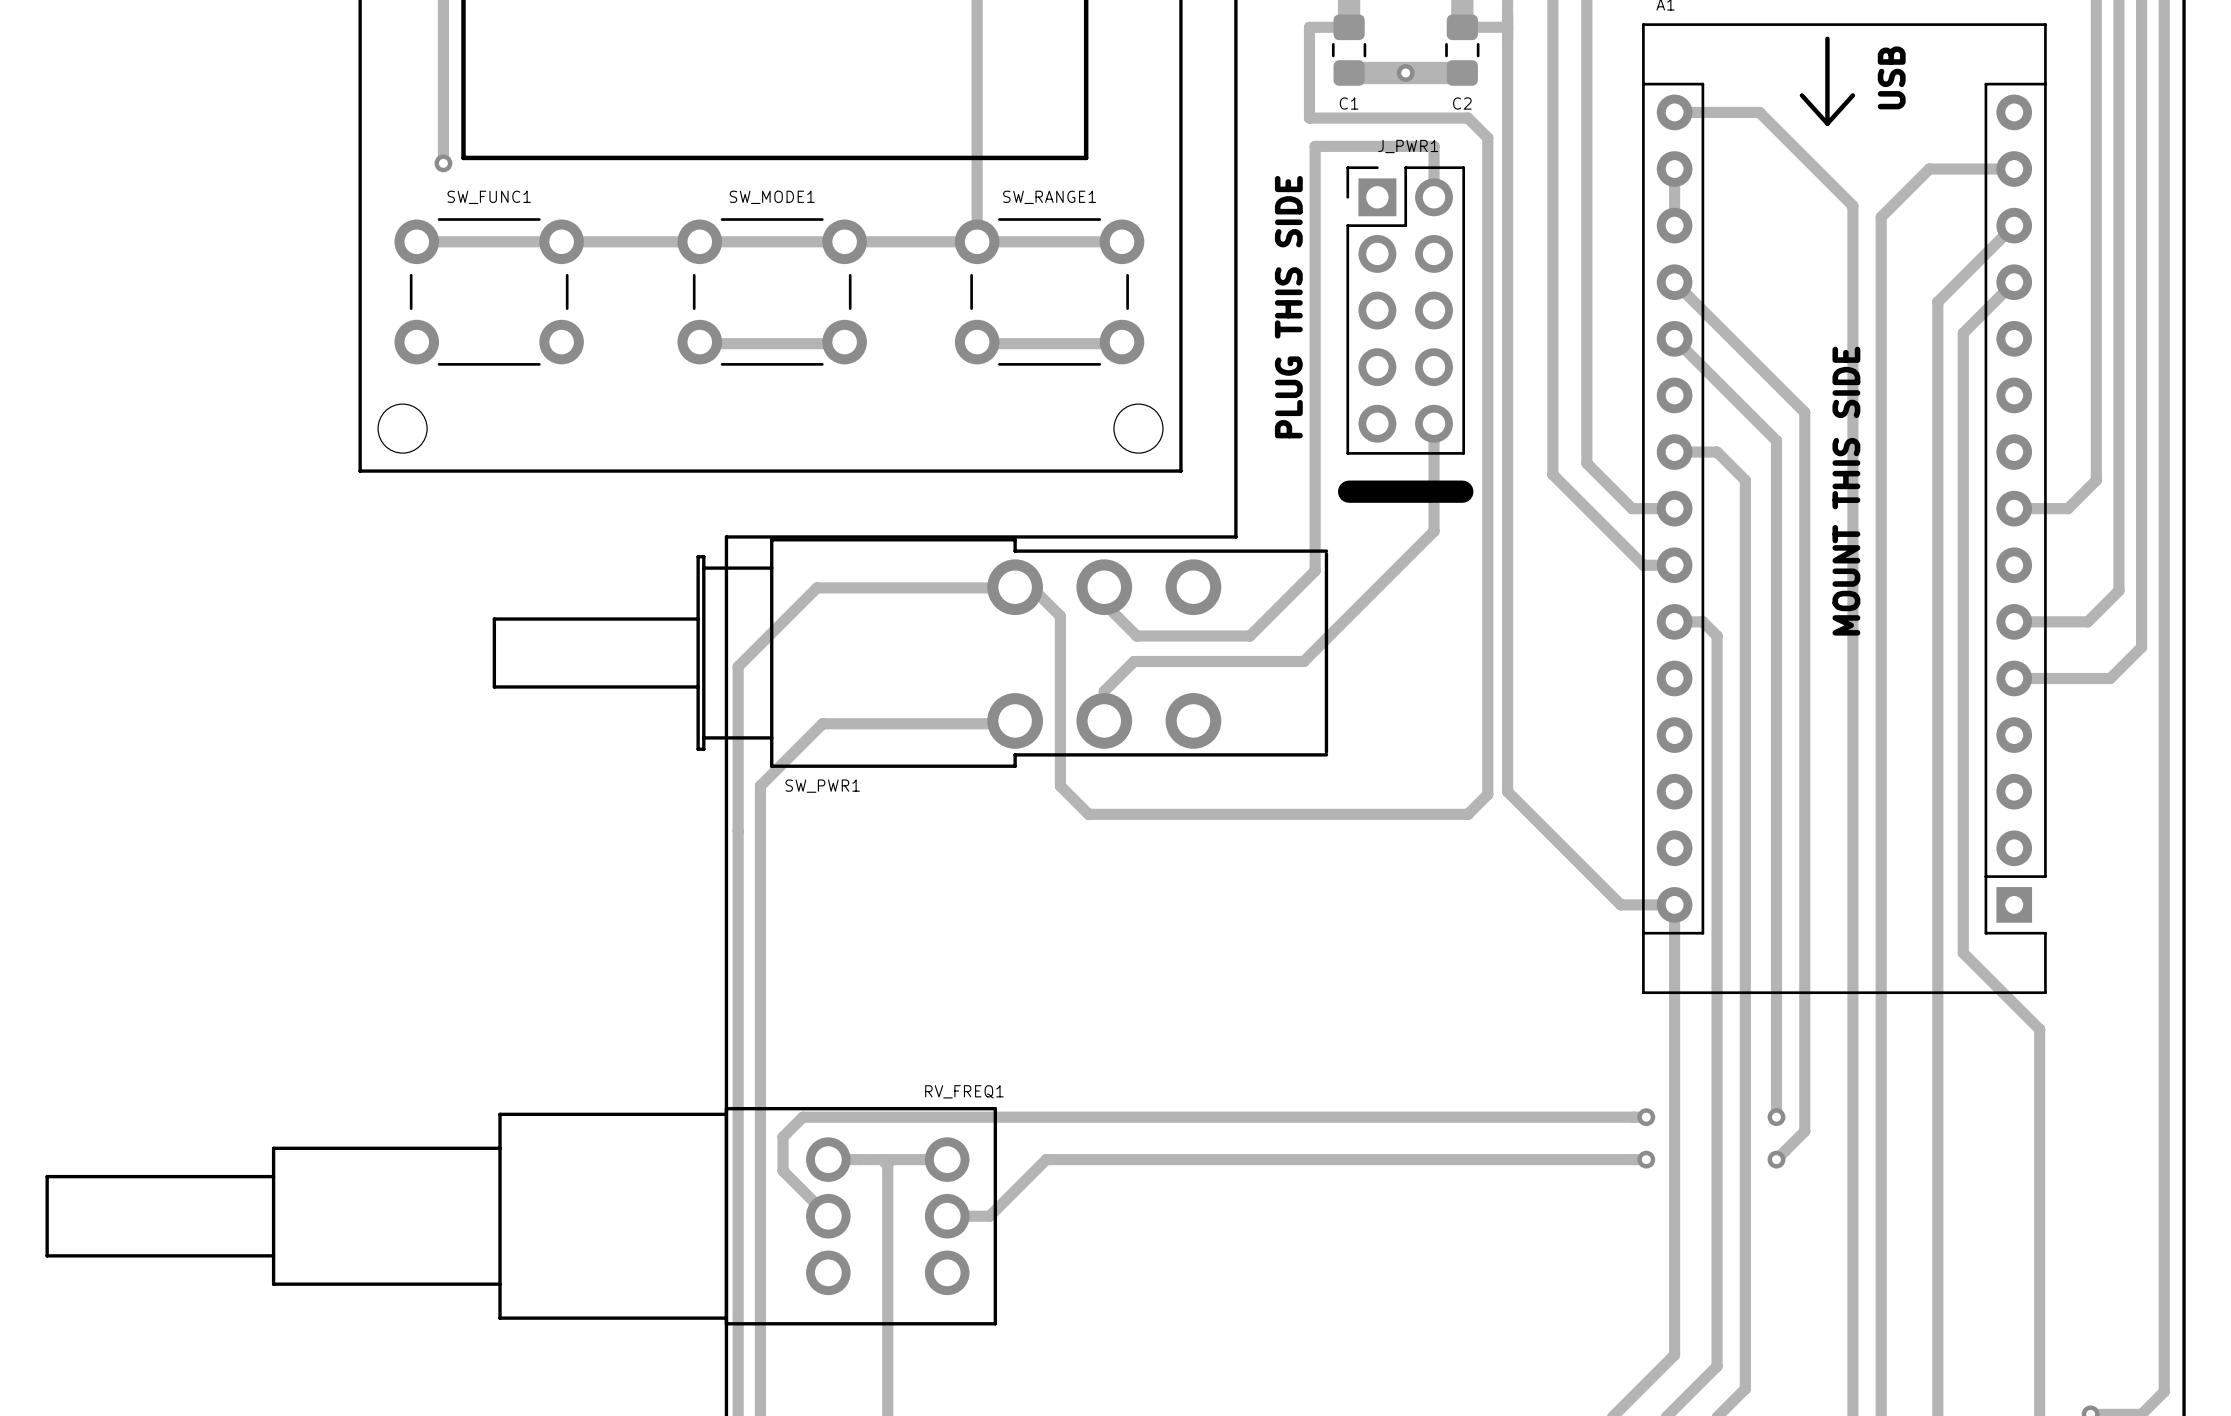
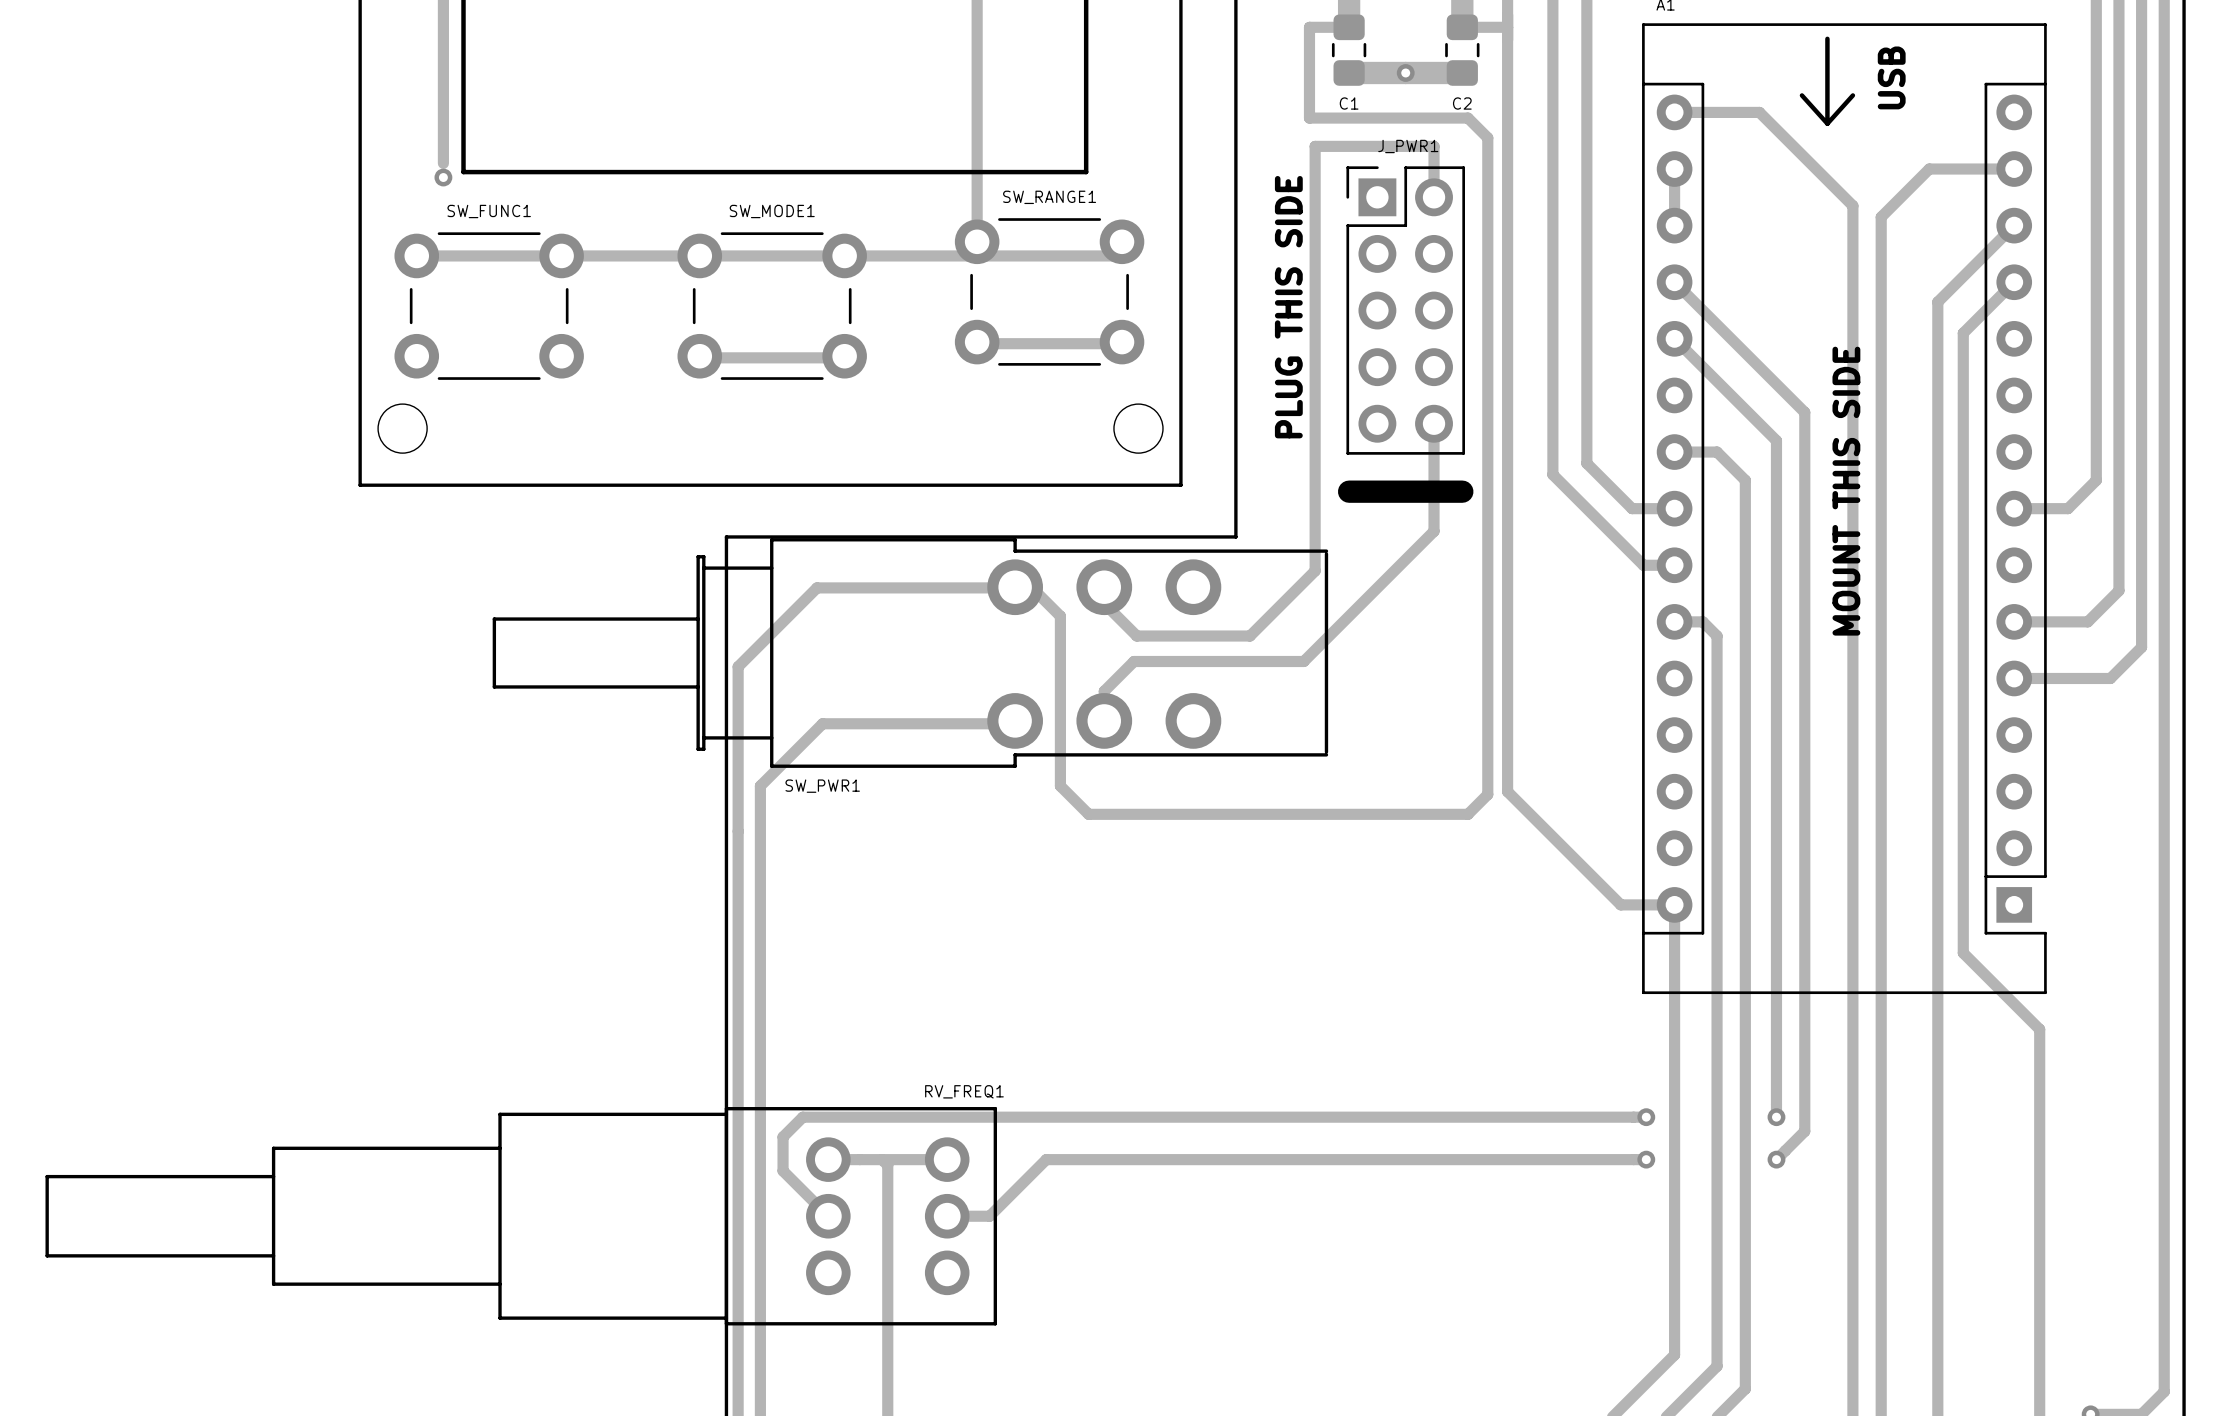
line: (463, 157) (1086, 157) -> (463, 157) (463, 172) (1086, 172) (1086, 157)
via position: (443, 163) -> (443, 177)
track: (422, 241) (1122, 241) -> (422, 255) (1122, 255)
SW_FUNC1 position: (489, 291) -> (489, 306)
SW_MODE1 position: (772, 291) -> (772, 306)
track: (834, 343) (715, 343) (702, 356) -> (834, 357) (715, 357) (702, 370)
board edge: (360, 471) (1180, 471) -> (360, 471) (360, 485) (1180, 485) (1180, 471)

